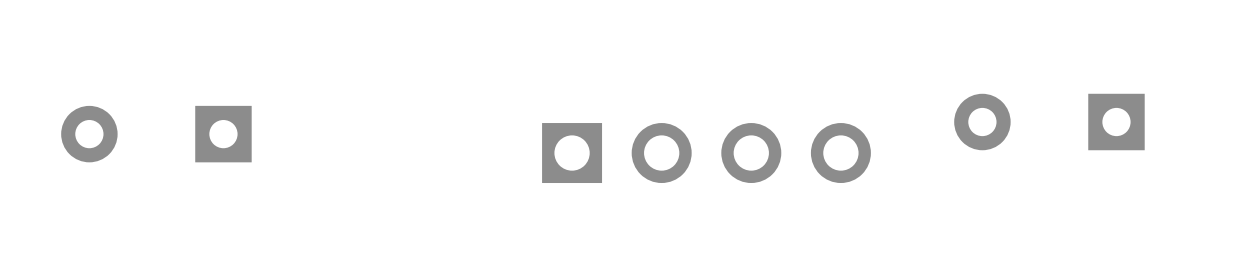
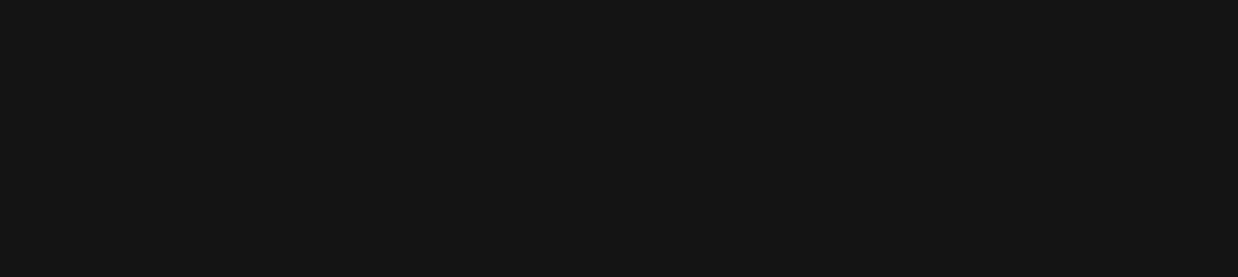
part: (1049, 122) -> none
part: (156, 134) -> none
part: (706, 153) -> none

